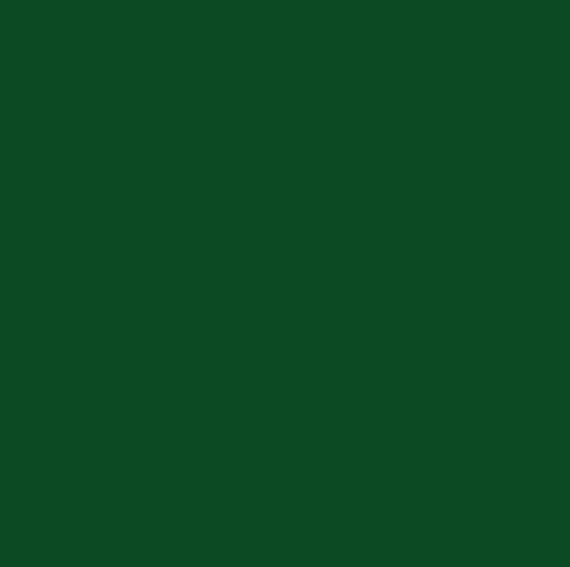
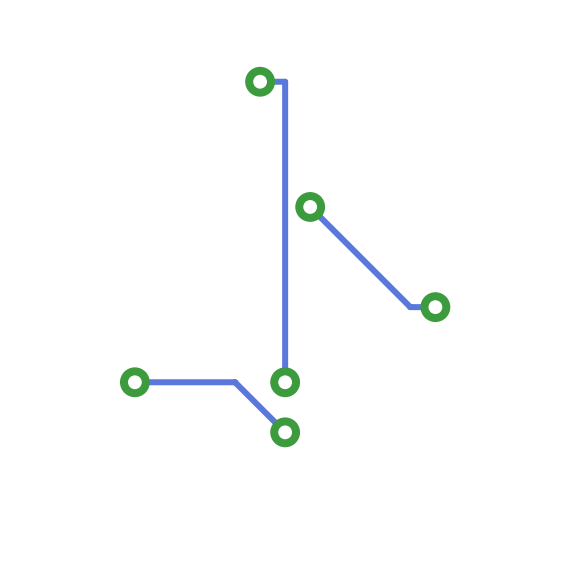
track: none -> (260, 81) (285, 81) (285, 382)
via: none -> (260, 81)
track: none -> (310, 206) (410, 307) (435, 307)
via: none -> (310, 206)
via: none -> (435, 307)
track: none -> (134, 382) (235, 382) (285, 432)
via: none -> (134, 382)
via: none -> (285, 382)
via: none -> (285, 432)

